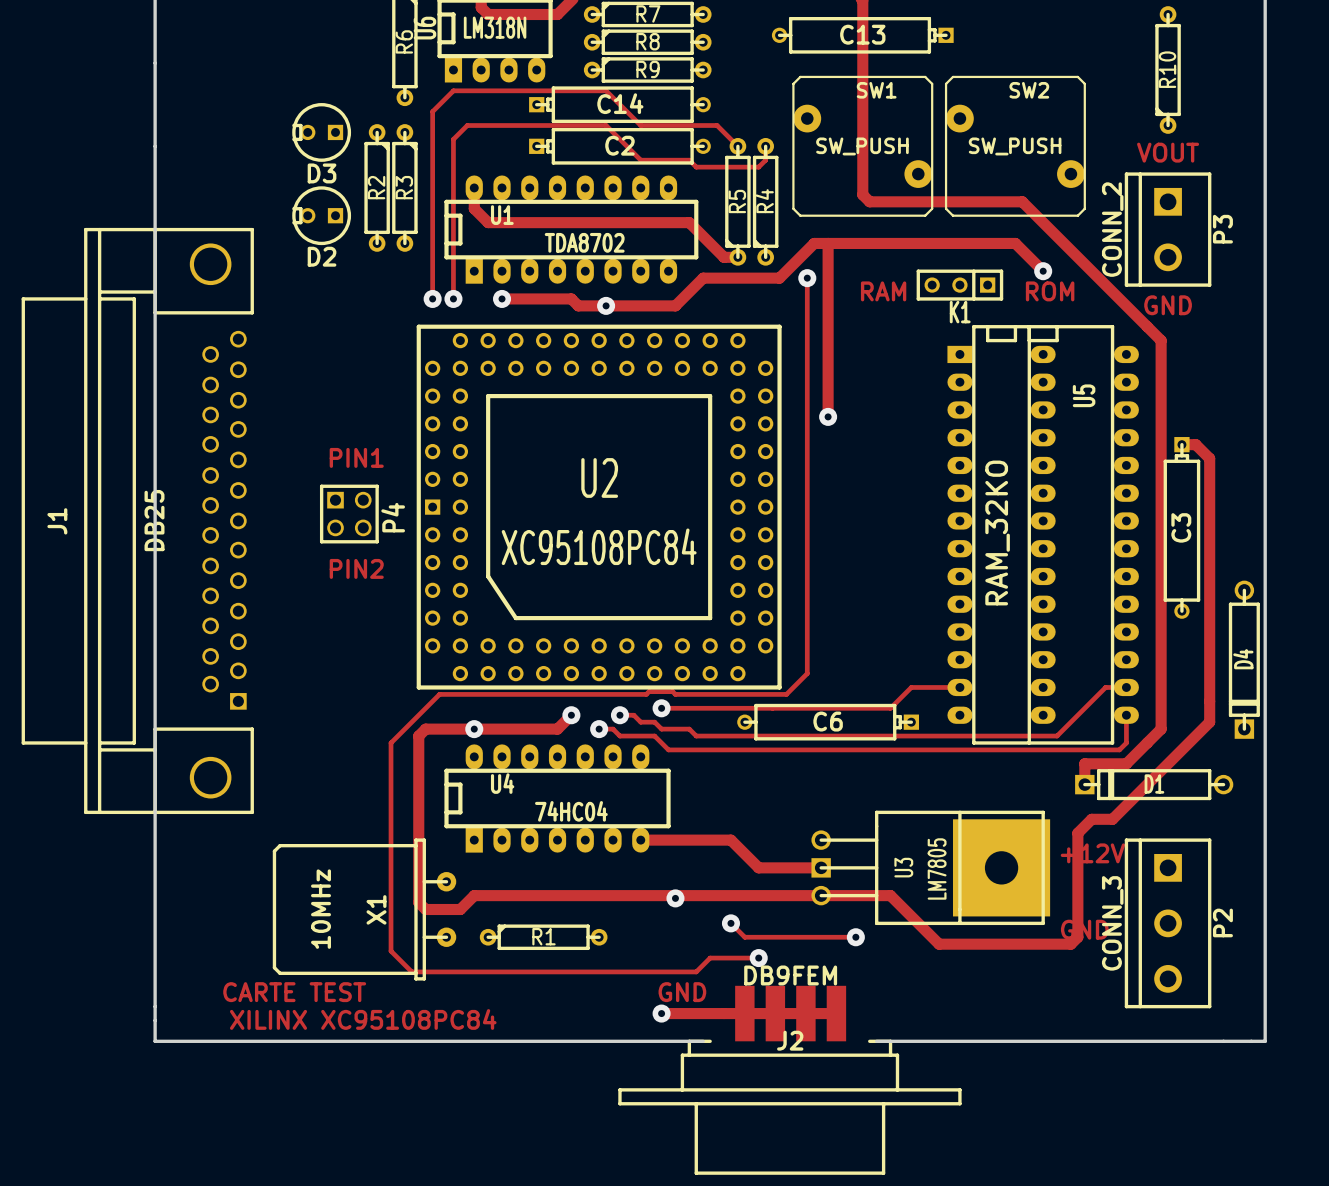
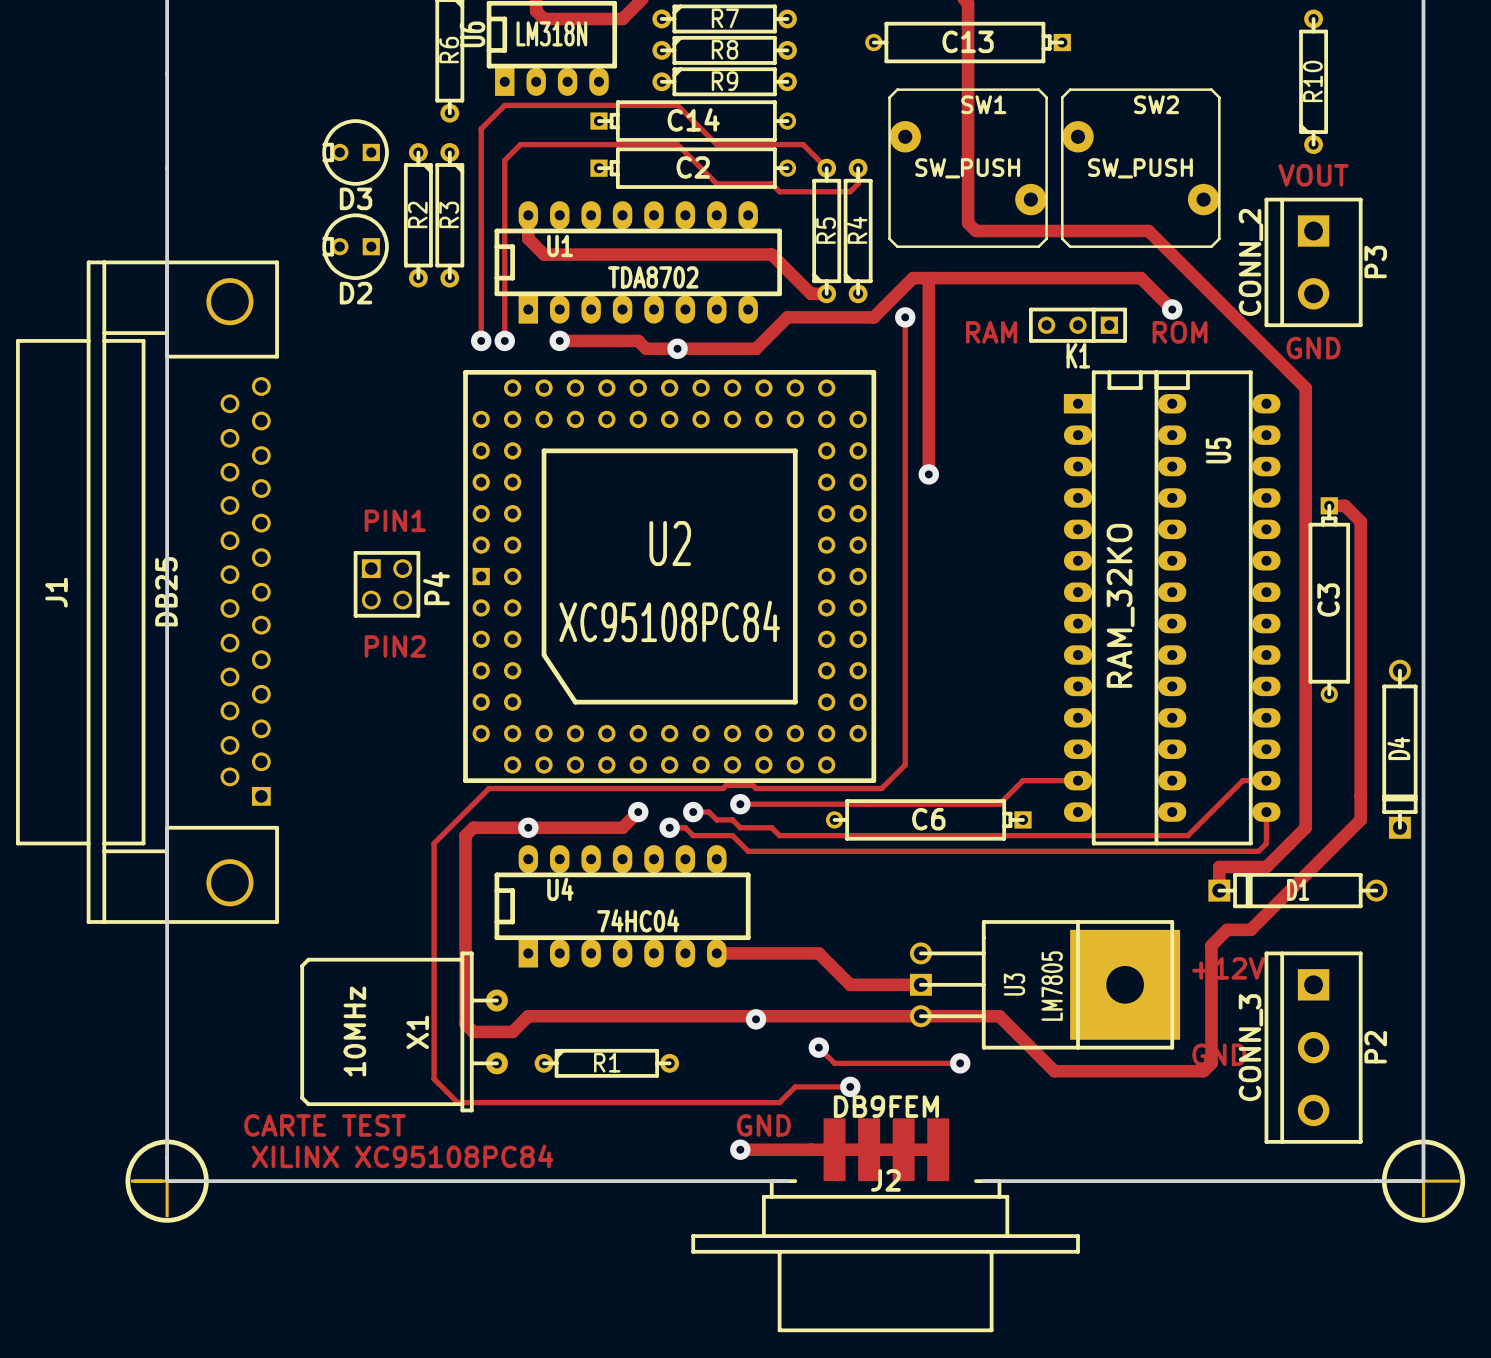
part: none -> (167, 1181)
part: none -> (1423, 1181)

